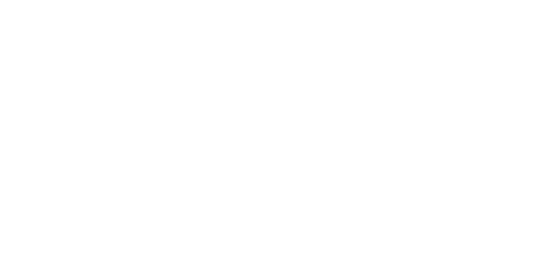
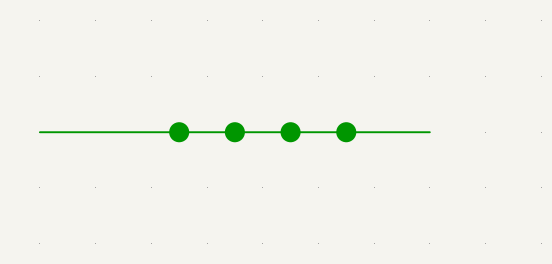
wire: none -> (39, 132) (429, 132)
junction: none -> (179, 132)
junction: none -> (234, 132)
junction: none -> (290, 132)
junction: none -> (346, 132)

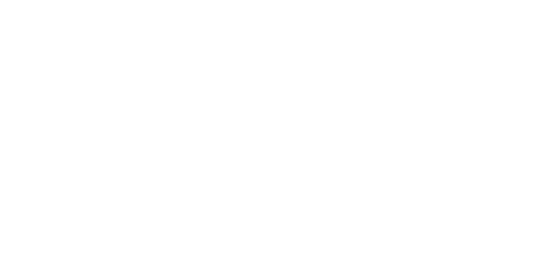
wire: (39, 132) (429, 132) -> none
junction: (179, 132) -> none
junction: (234, 132) -> none
junction: (290, 132) -> none
junction: (346, 132) -> none

